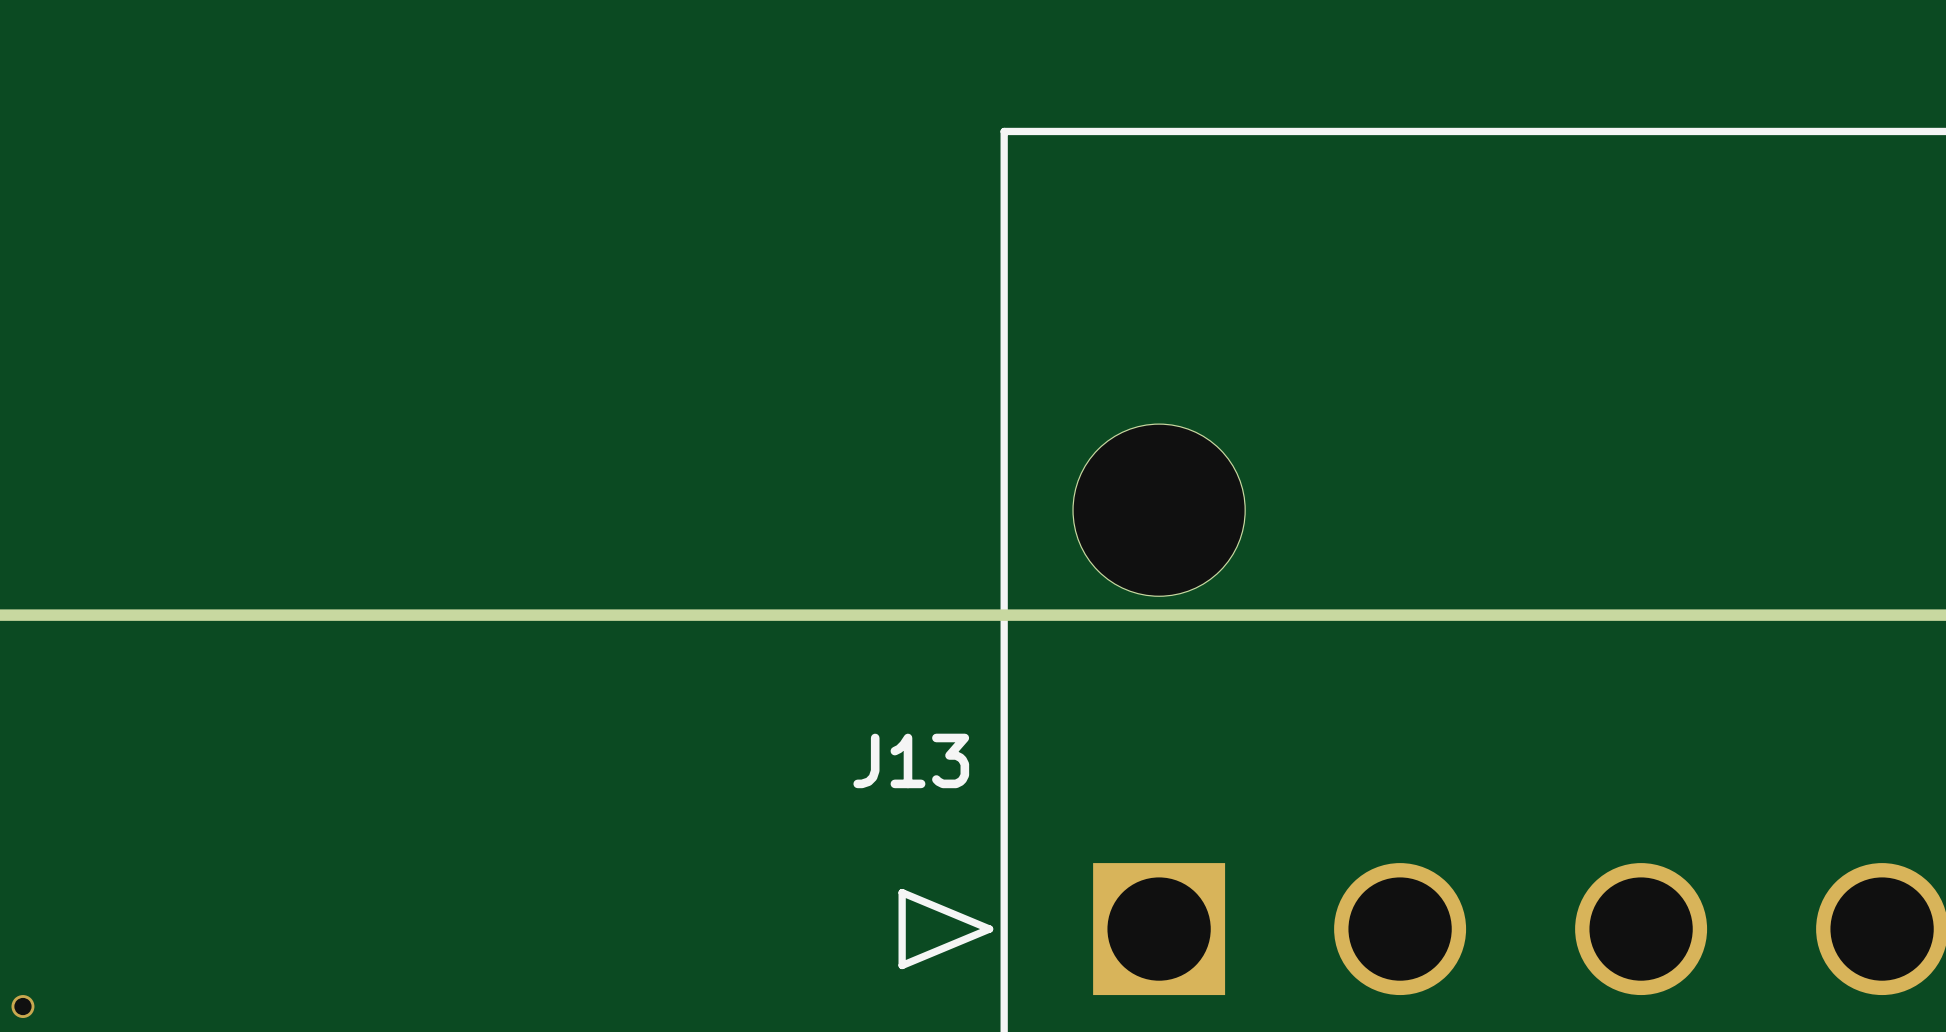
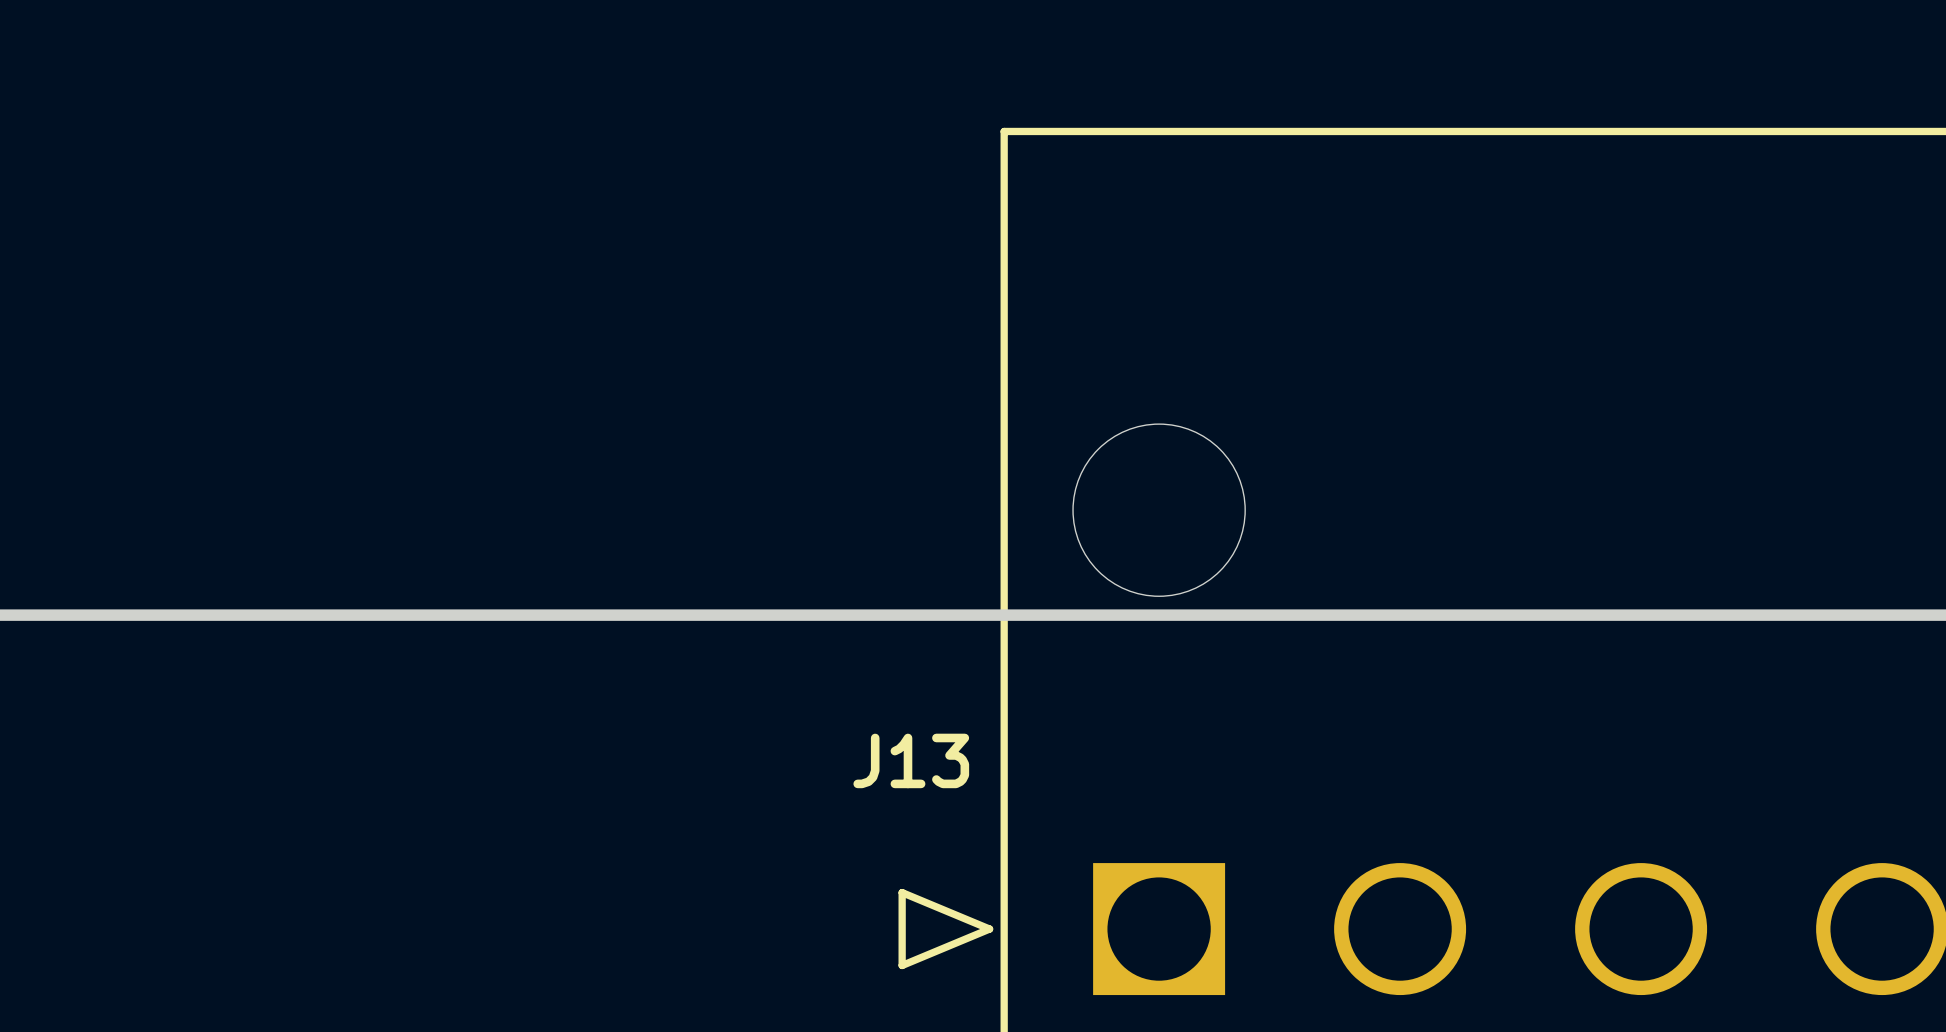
via: (22, 1006) -> none

